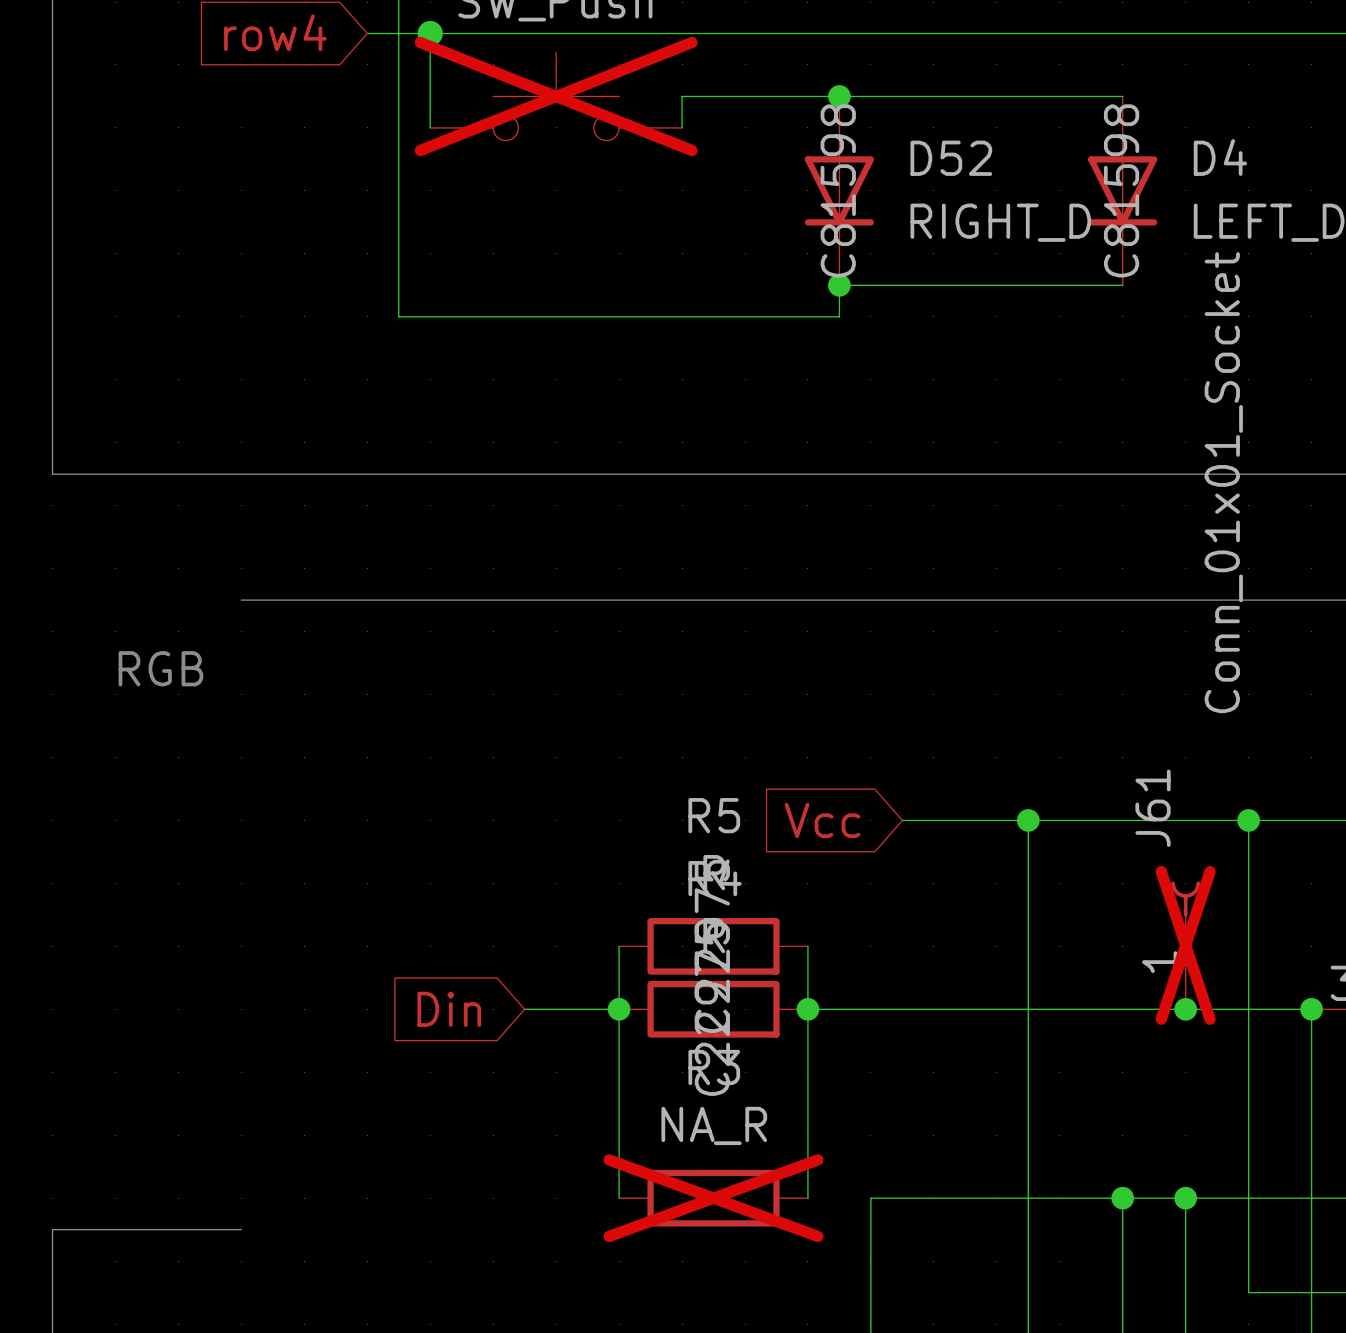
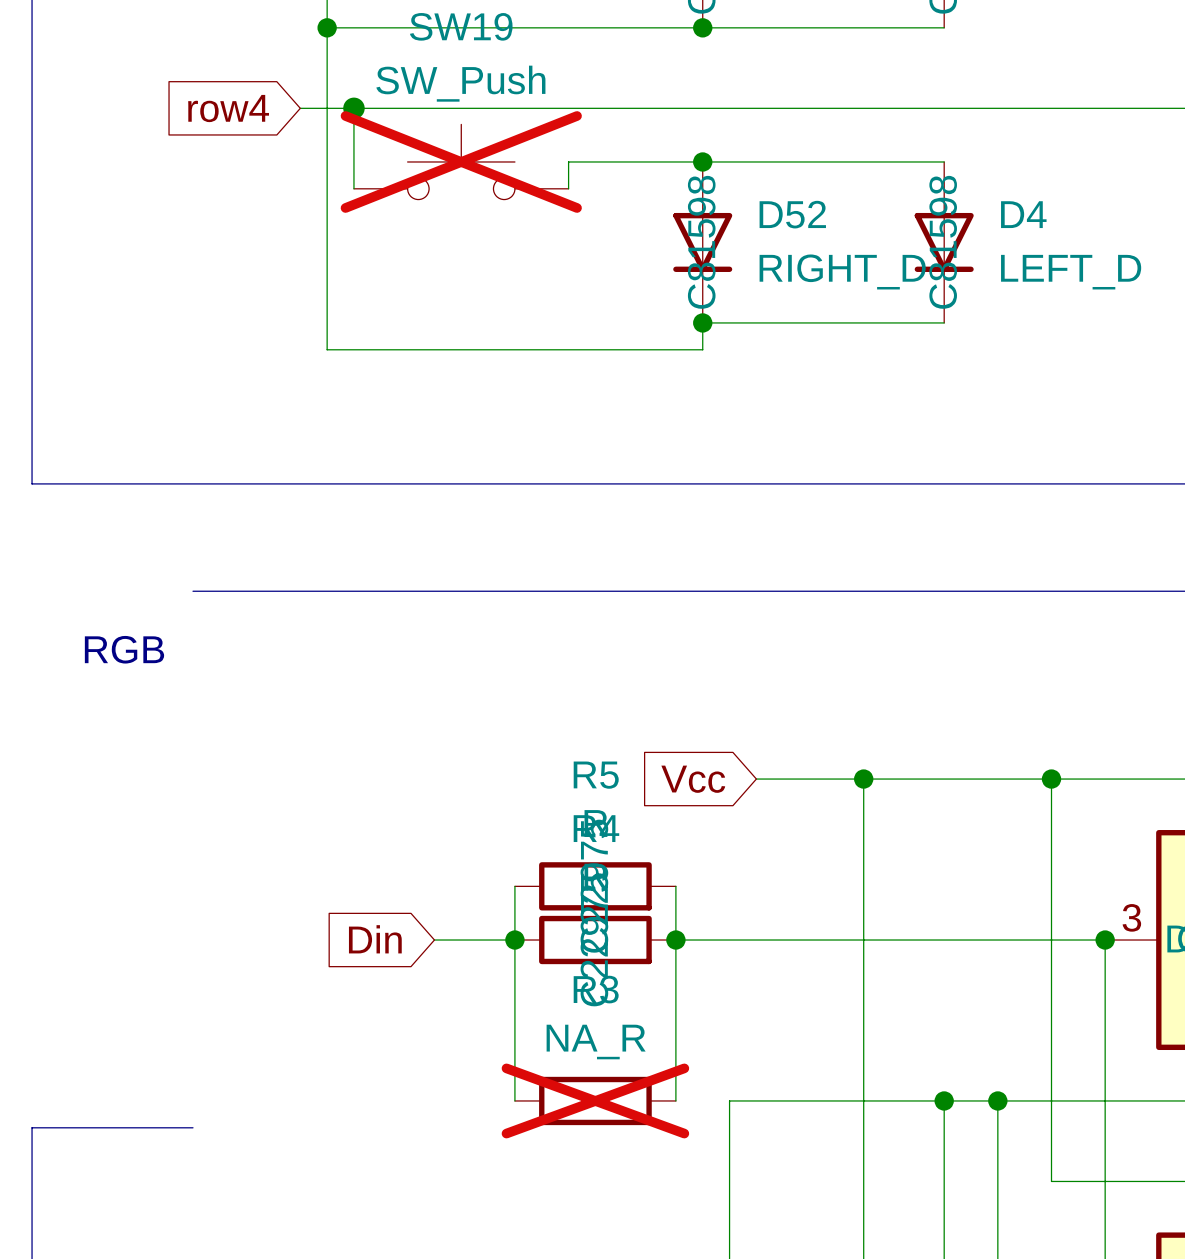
J61: Conn_01x01_Socket (1185, 945) -> none
junction: (1185, 1009) -> none

